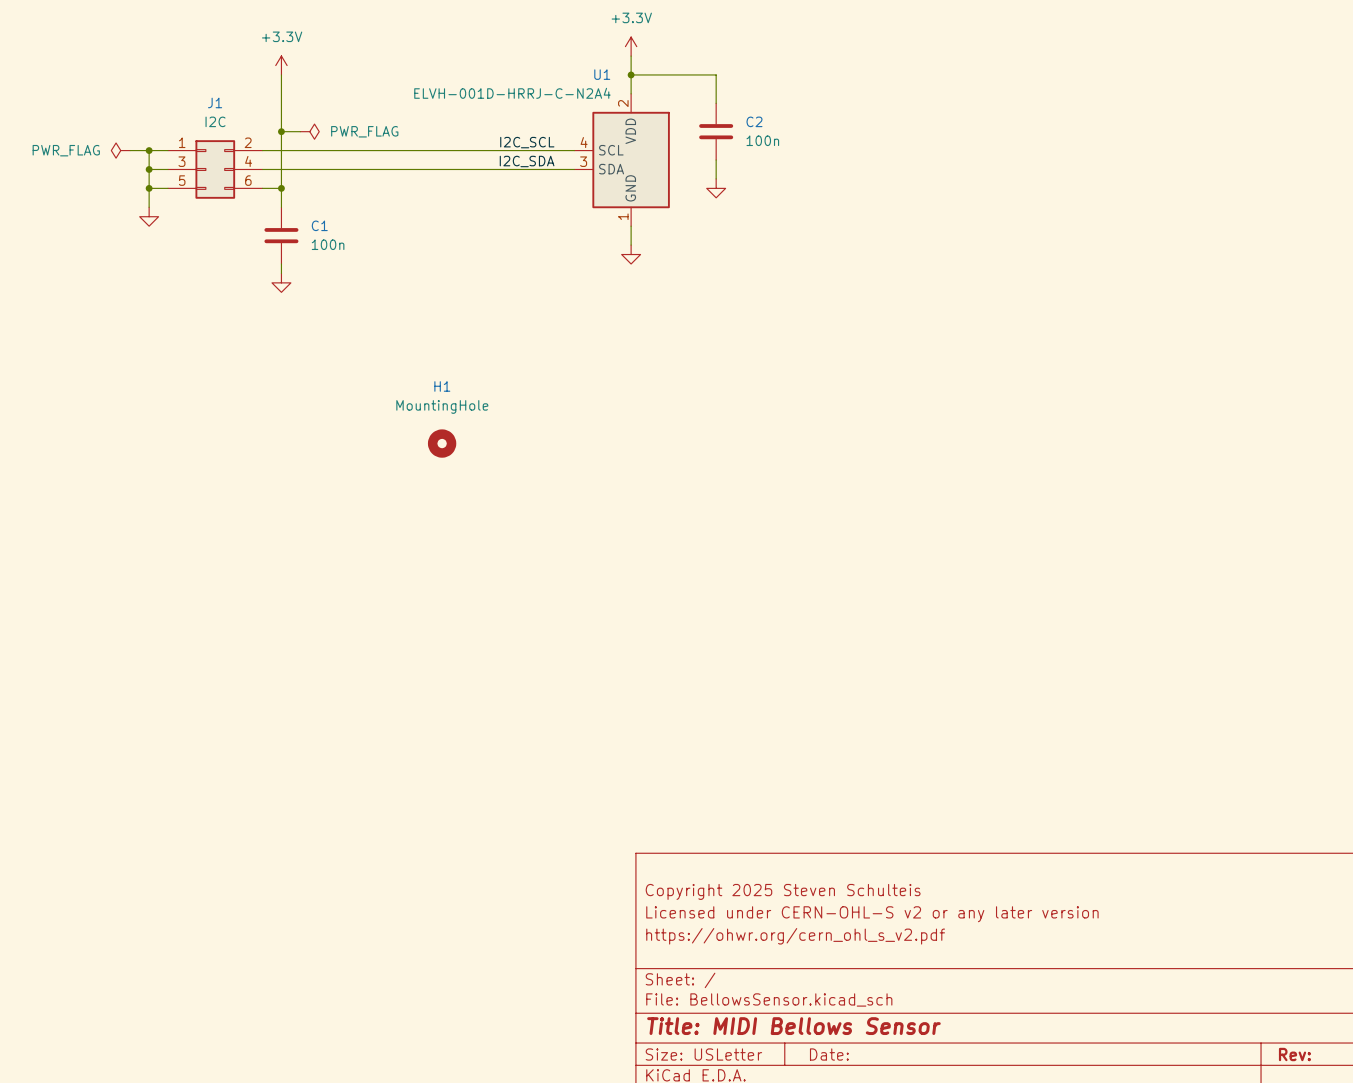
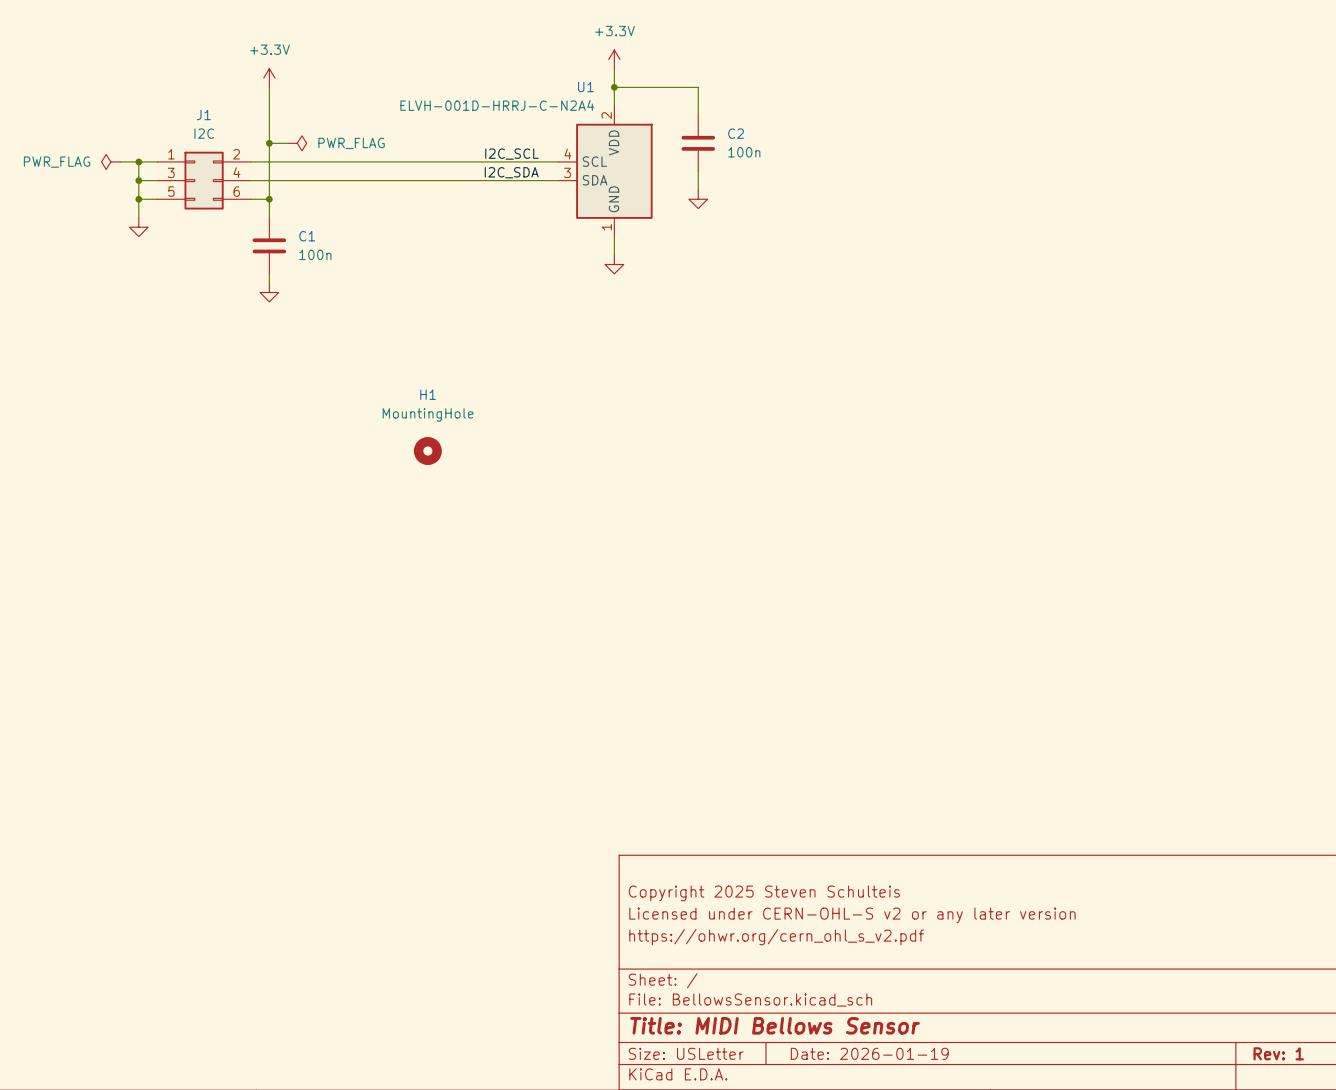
title block: Date: (829, 1054) -> Date: 2026-01-19 (869, 1053)
title block: Rev: (1294, 1054) -> Rev: 1 (1278, 1053)

